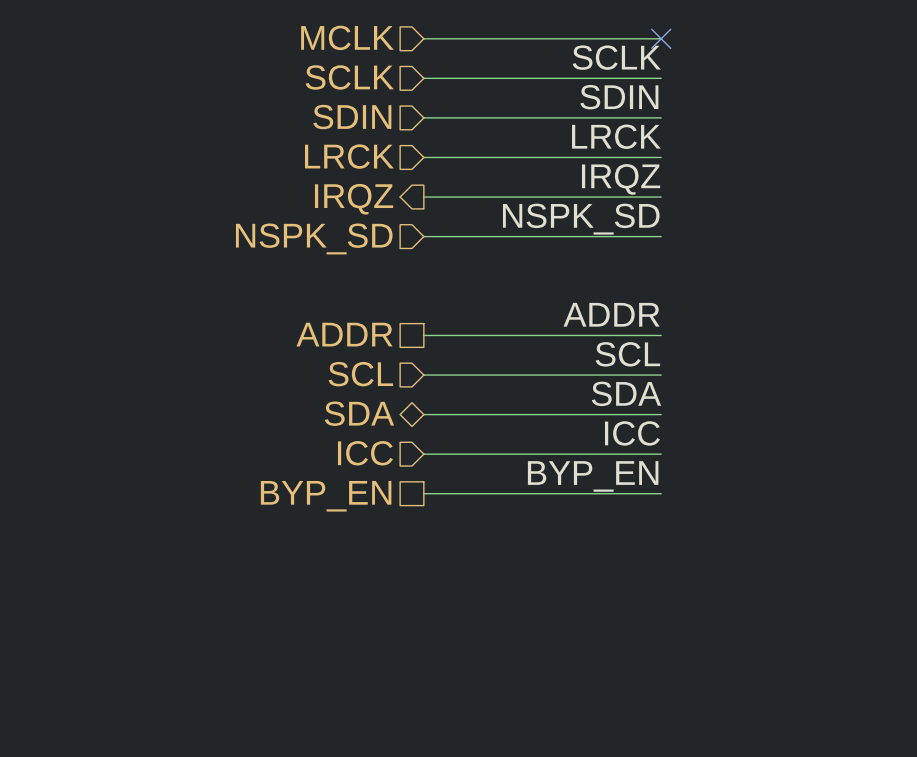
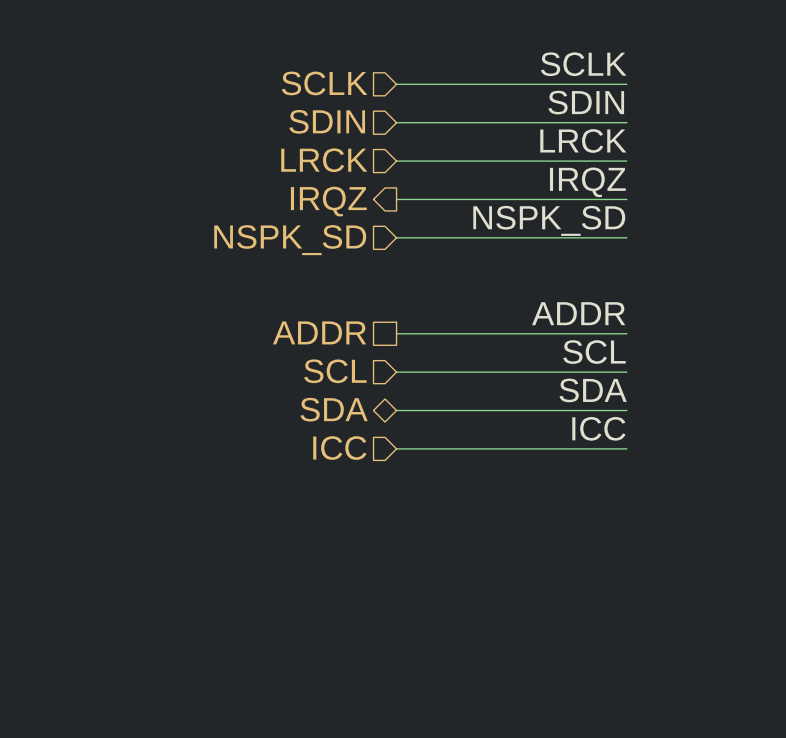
hierarchical label: MCLK (347, 37) -> none
wire: (423, 38) (661, 38) -> none
no-connect mark: (661, 38) -> none
label: BYP_EN (593, 476) -> none
wire: (423, 493) (661, 493) -> none
hierarchical label: BYP_EN (326, 496) -> none

